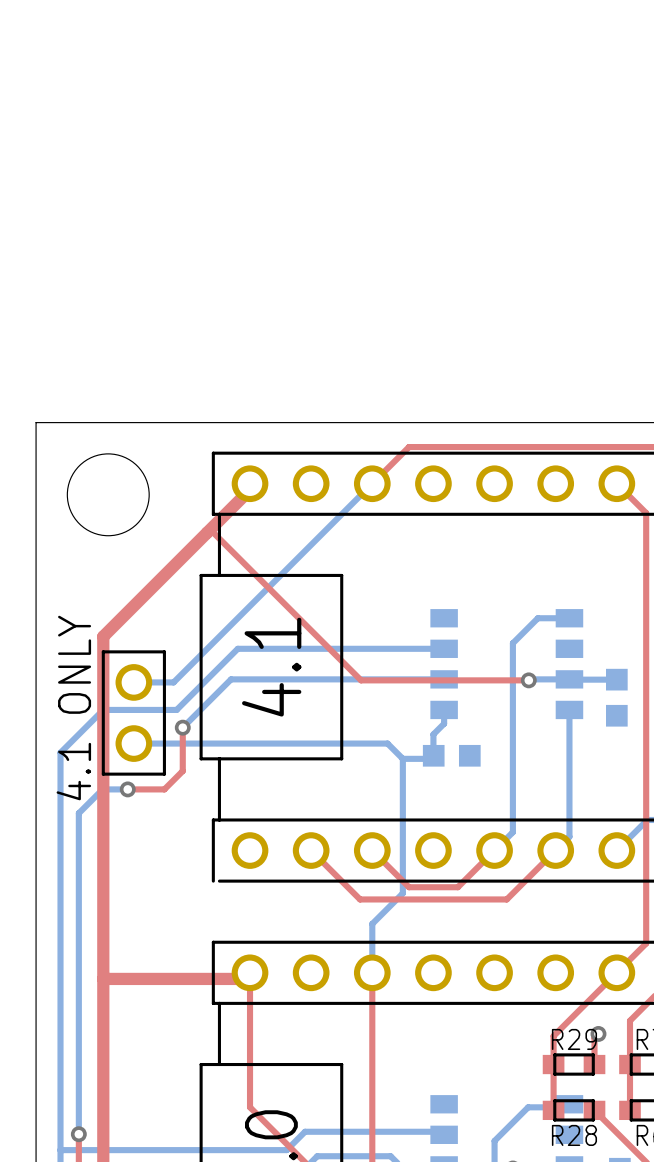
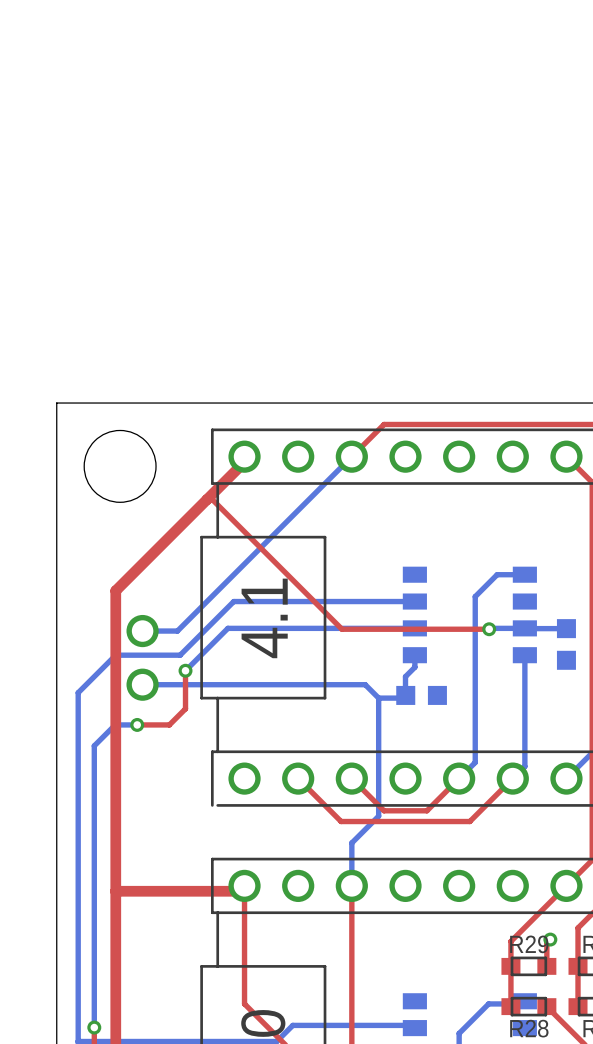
part footprint: [101, 650, 166, 776] -> [126, 614, 159, 701]
text: 4.1 ONLY (73, 708) -> none

